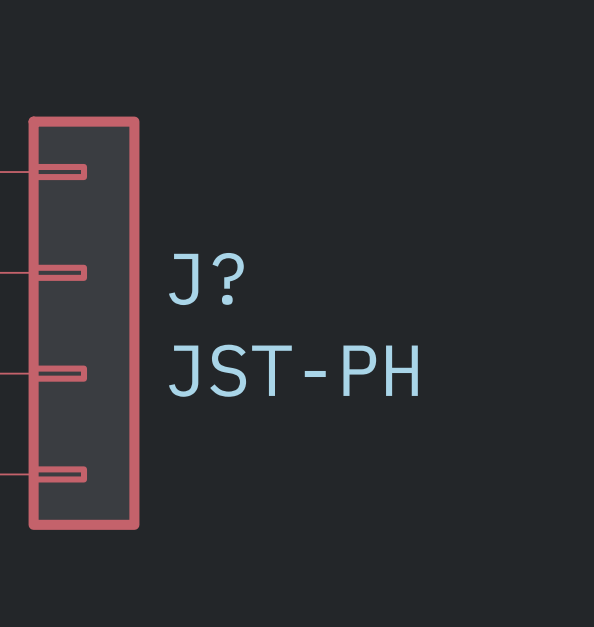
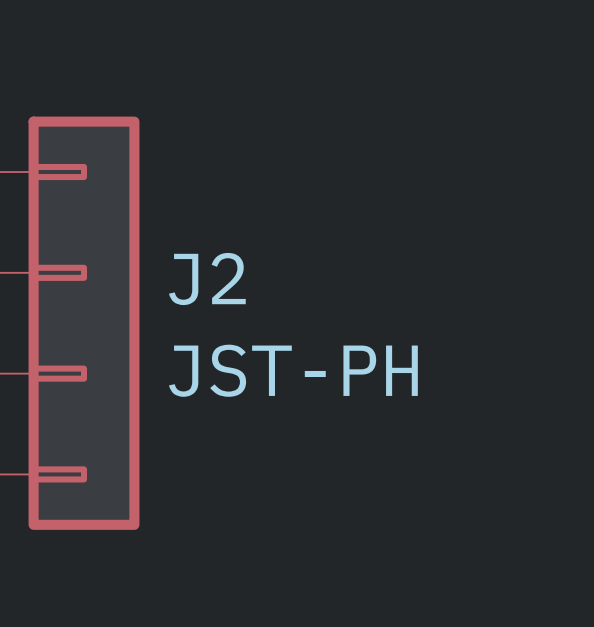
J? name: J? (206, 279) -> J2 (207, 279)

